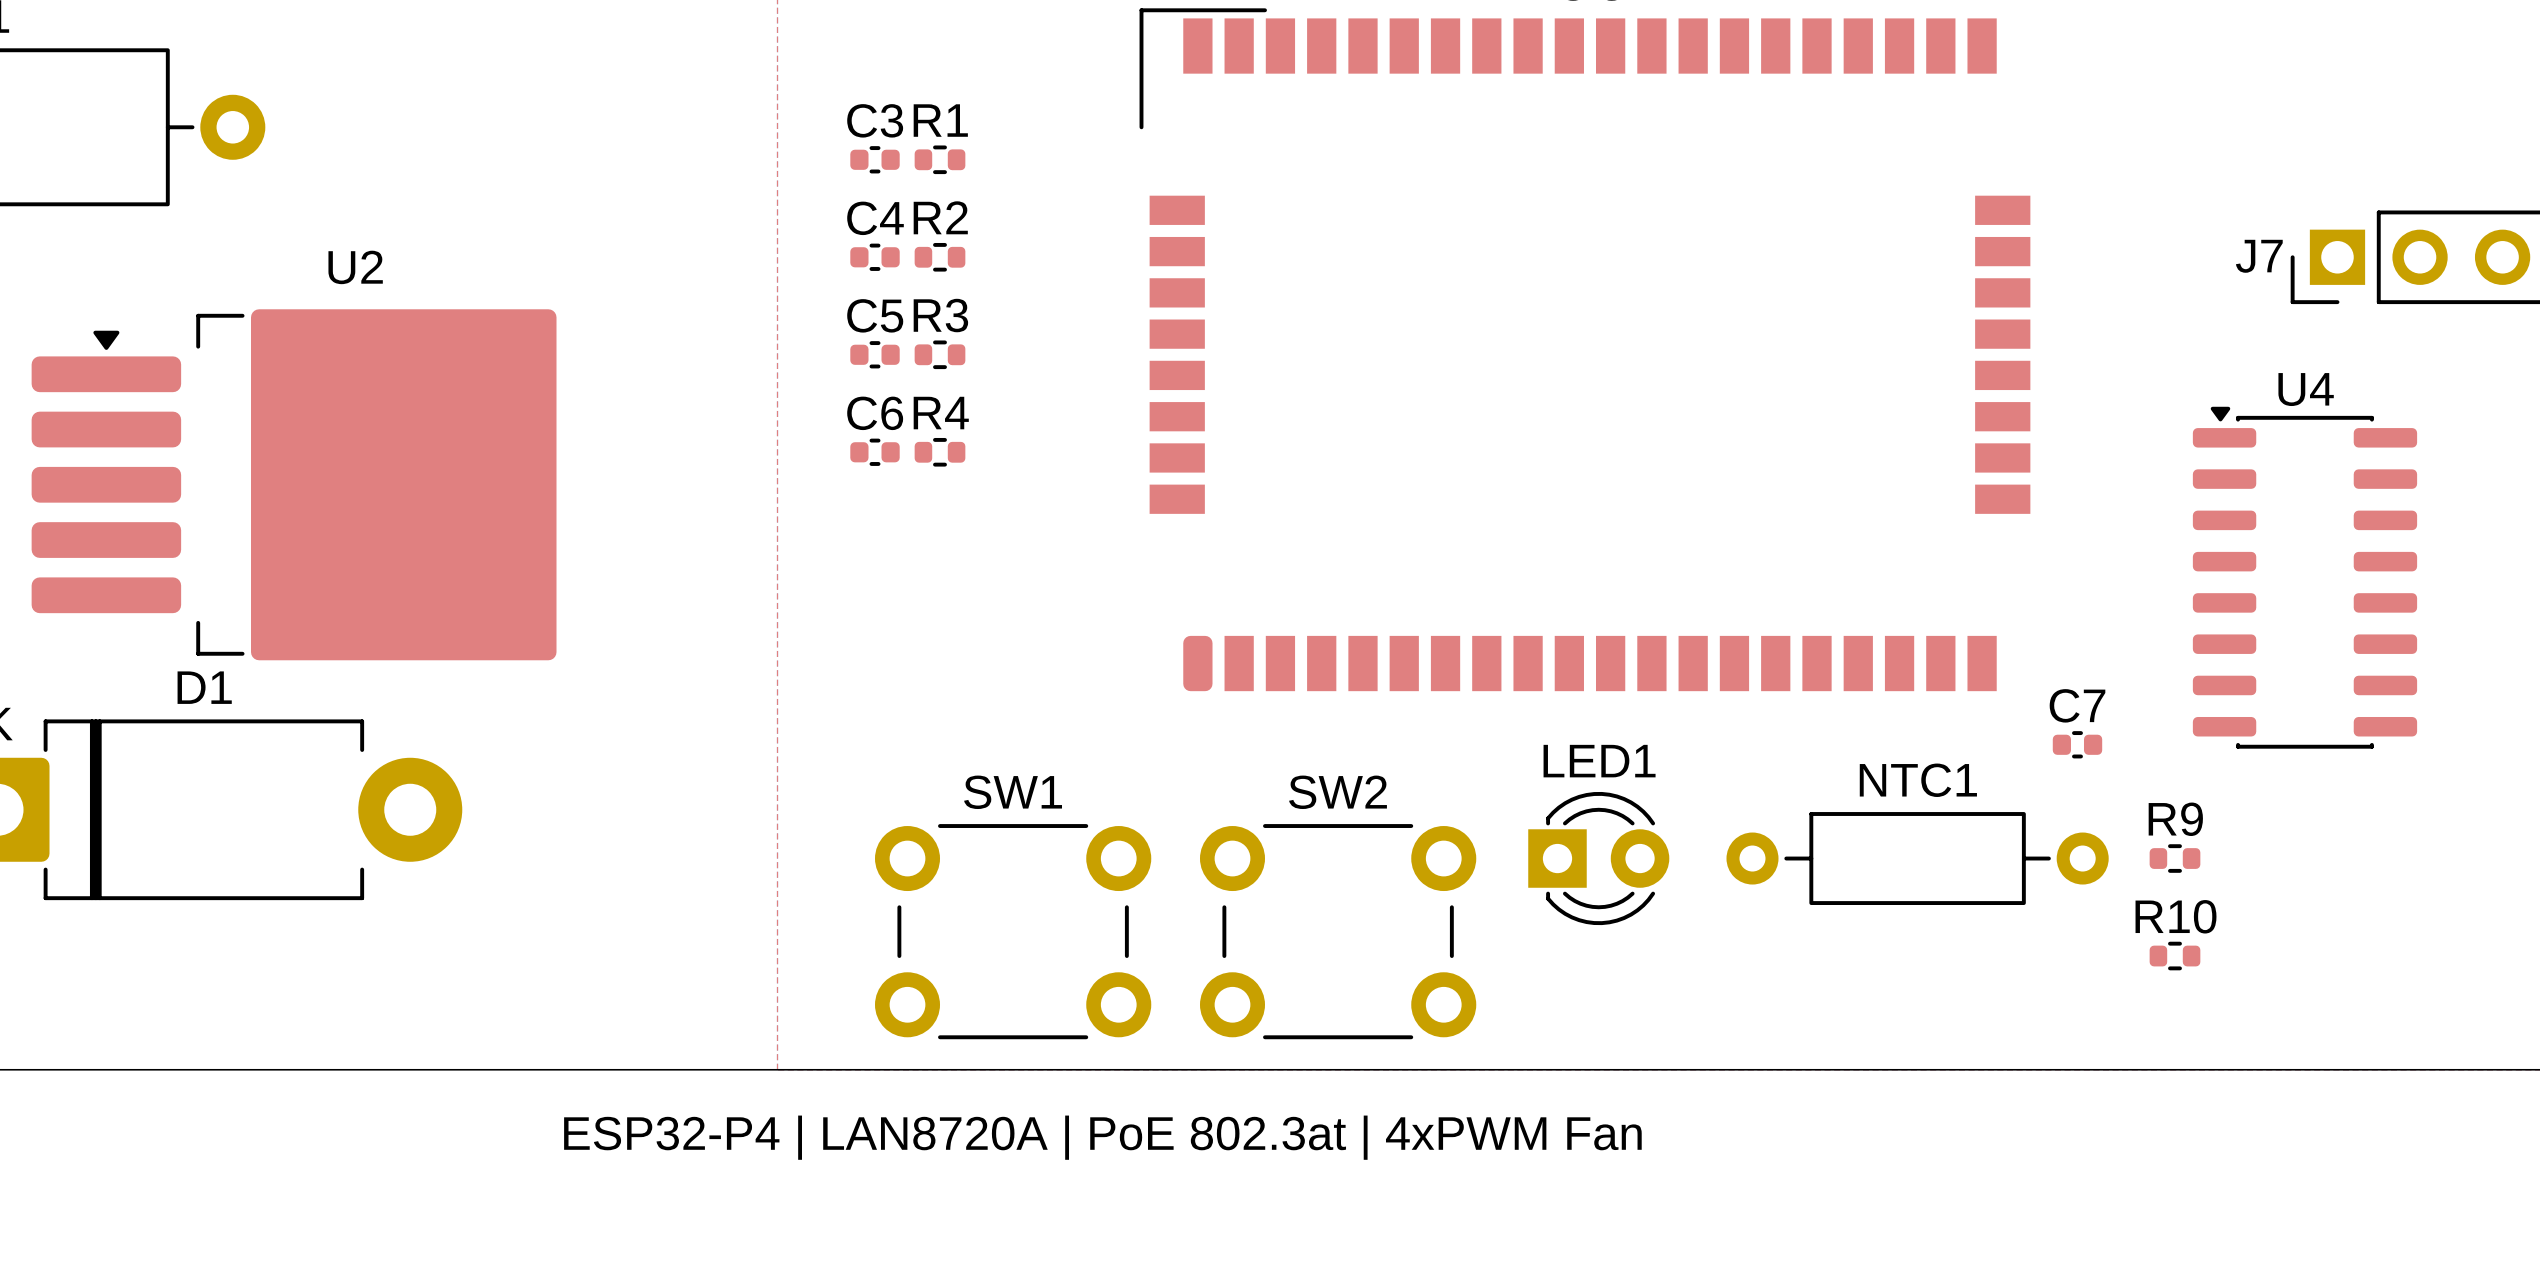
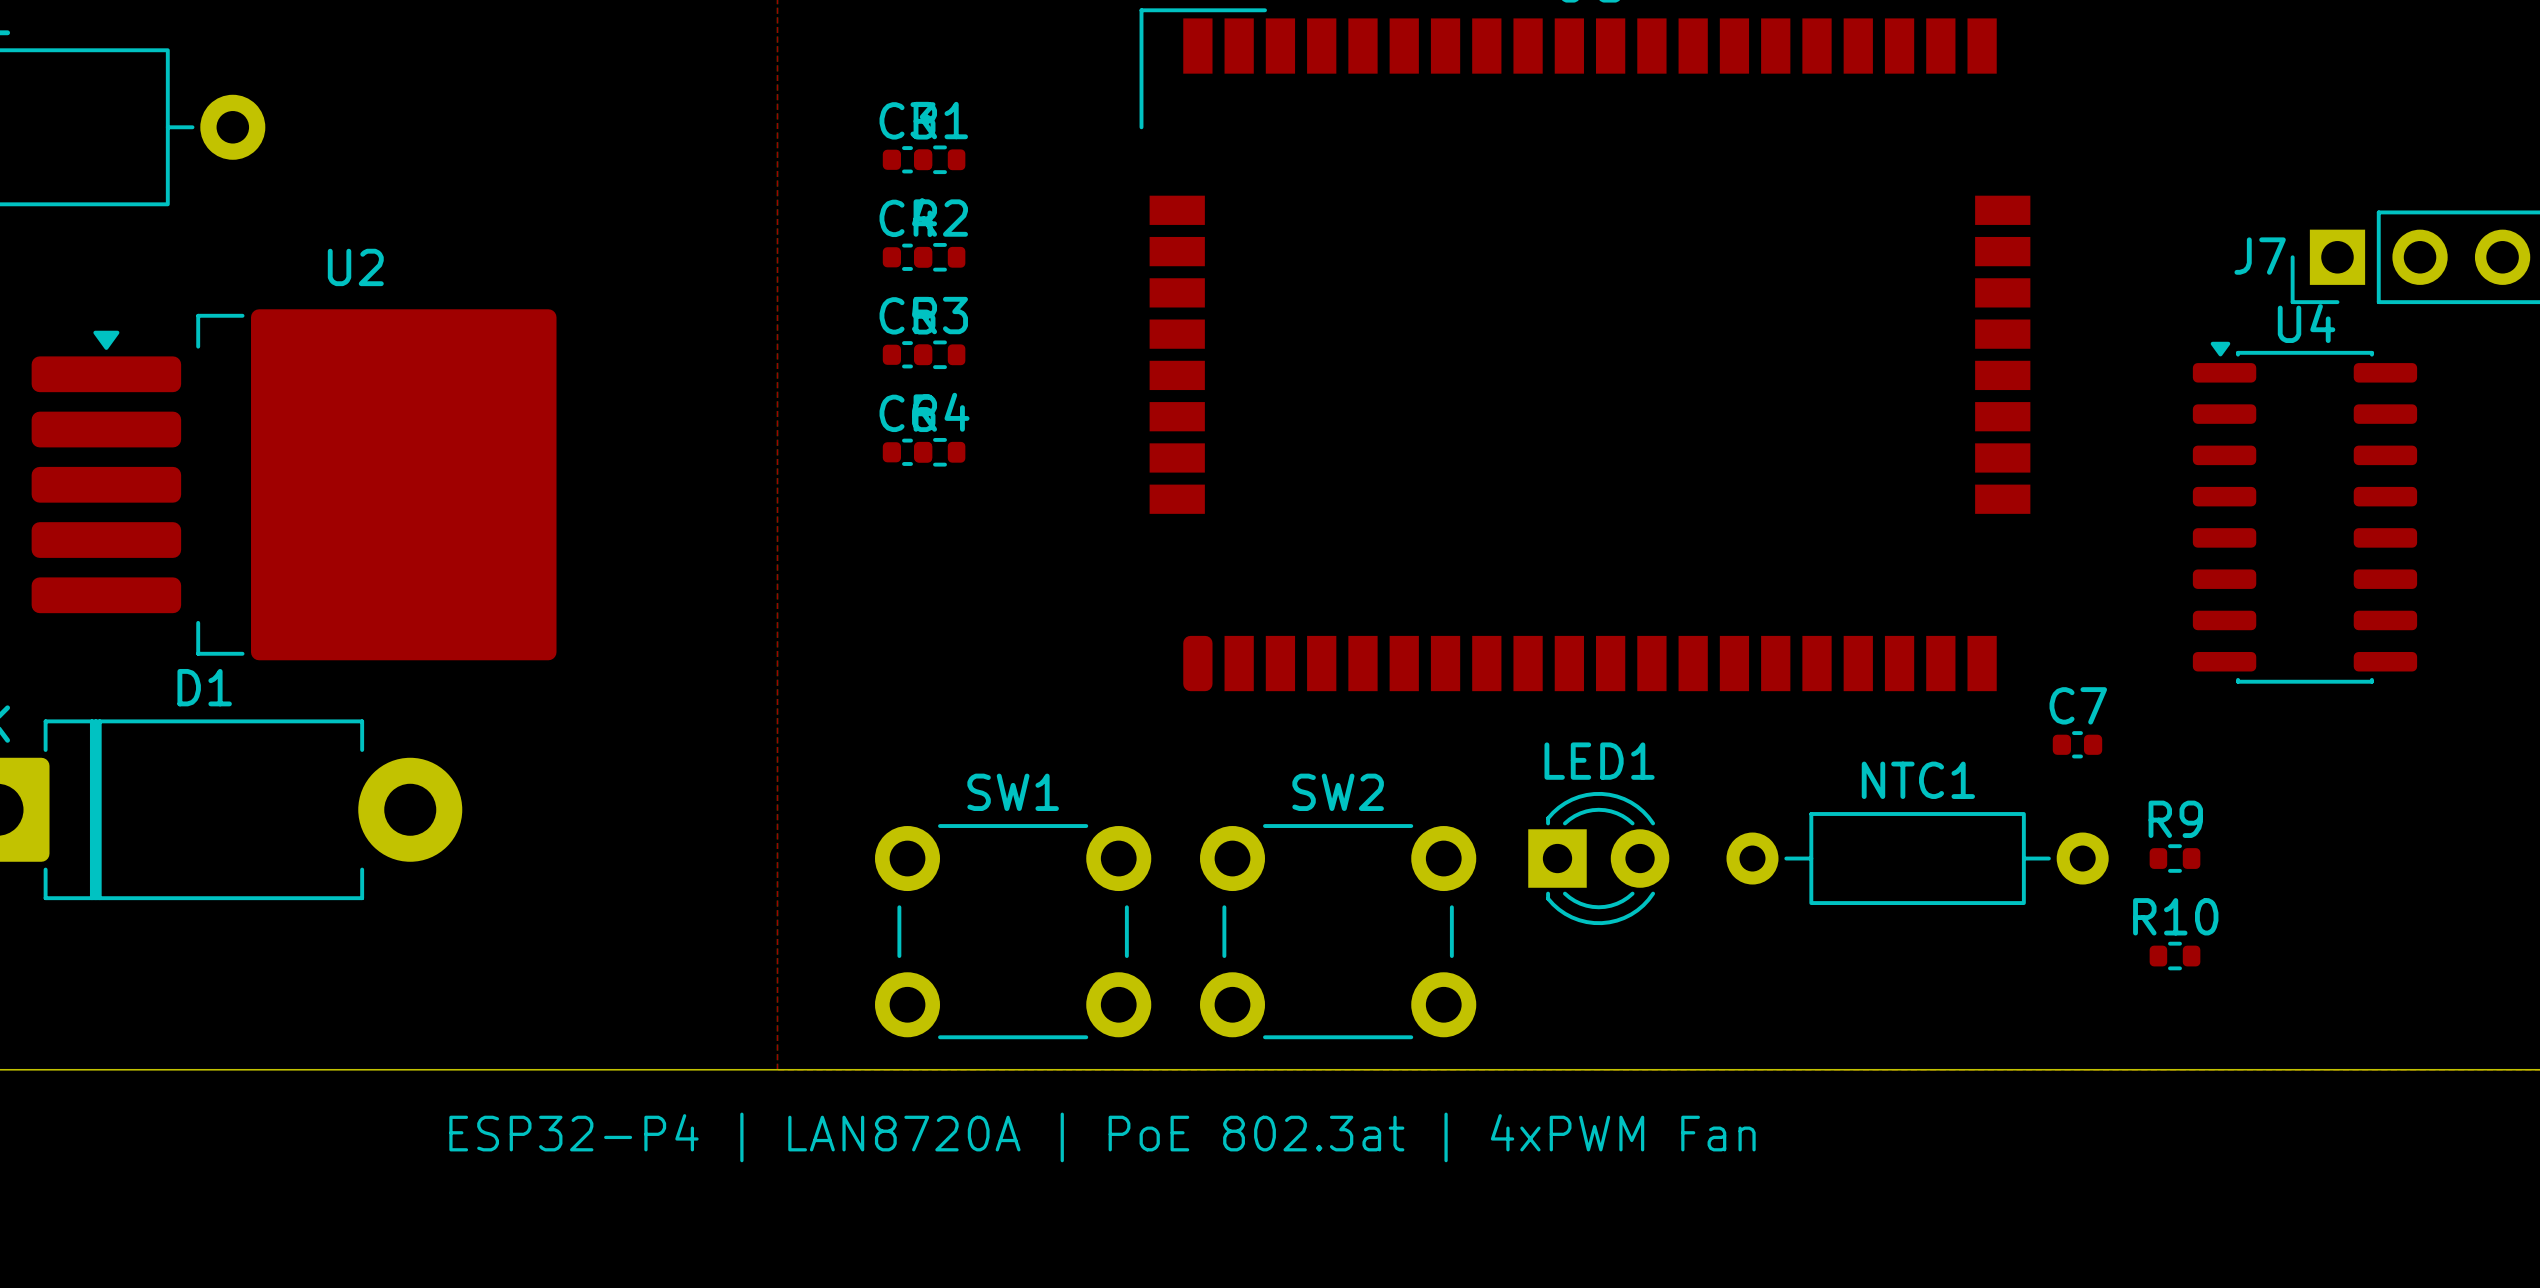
C3 position: (875, 159) -> (907, 159)
C4 position: (875, 257) -> (907, 257)
C5 position: (875, 354) -> (907, 354)
C6 position: (875, 452) -> (907, 452)
U4 position: (2304, 577) -> (2304, 512)

